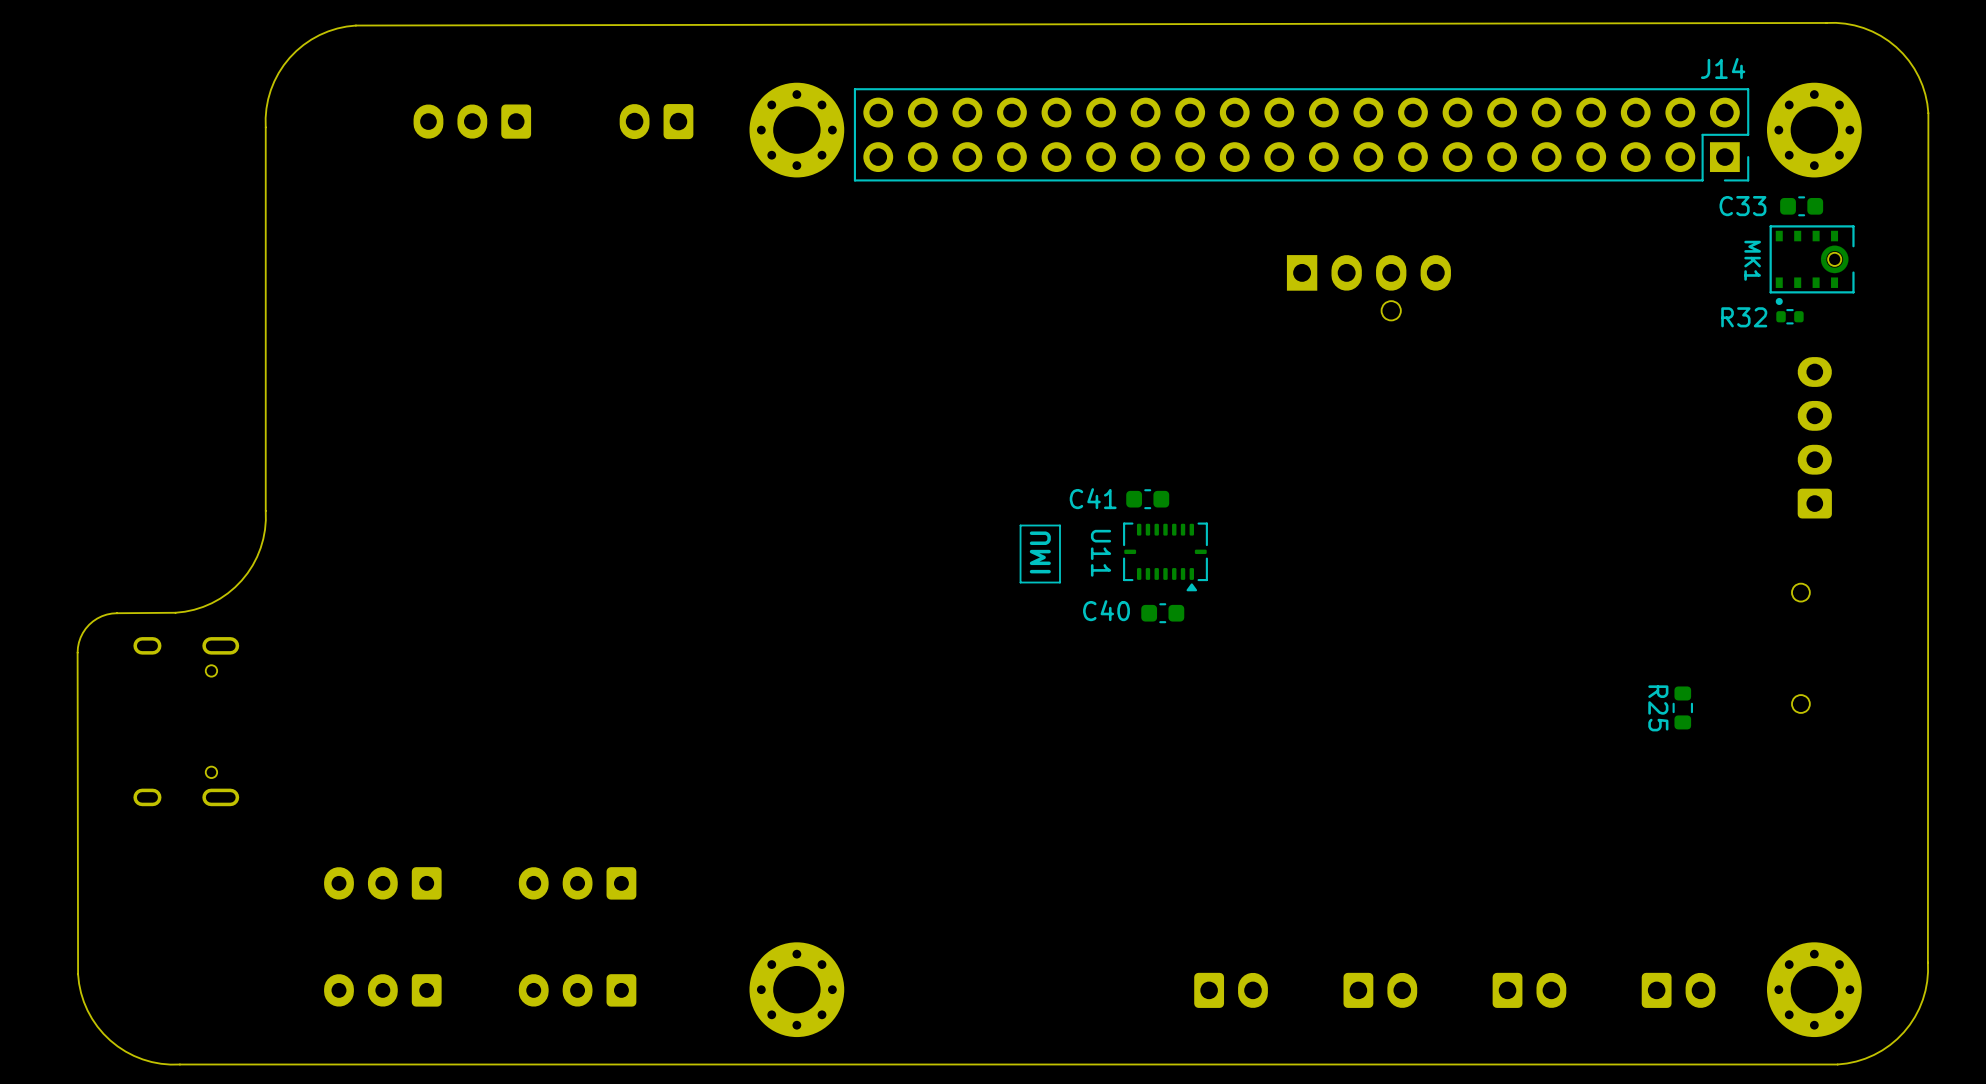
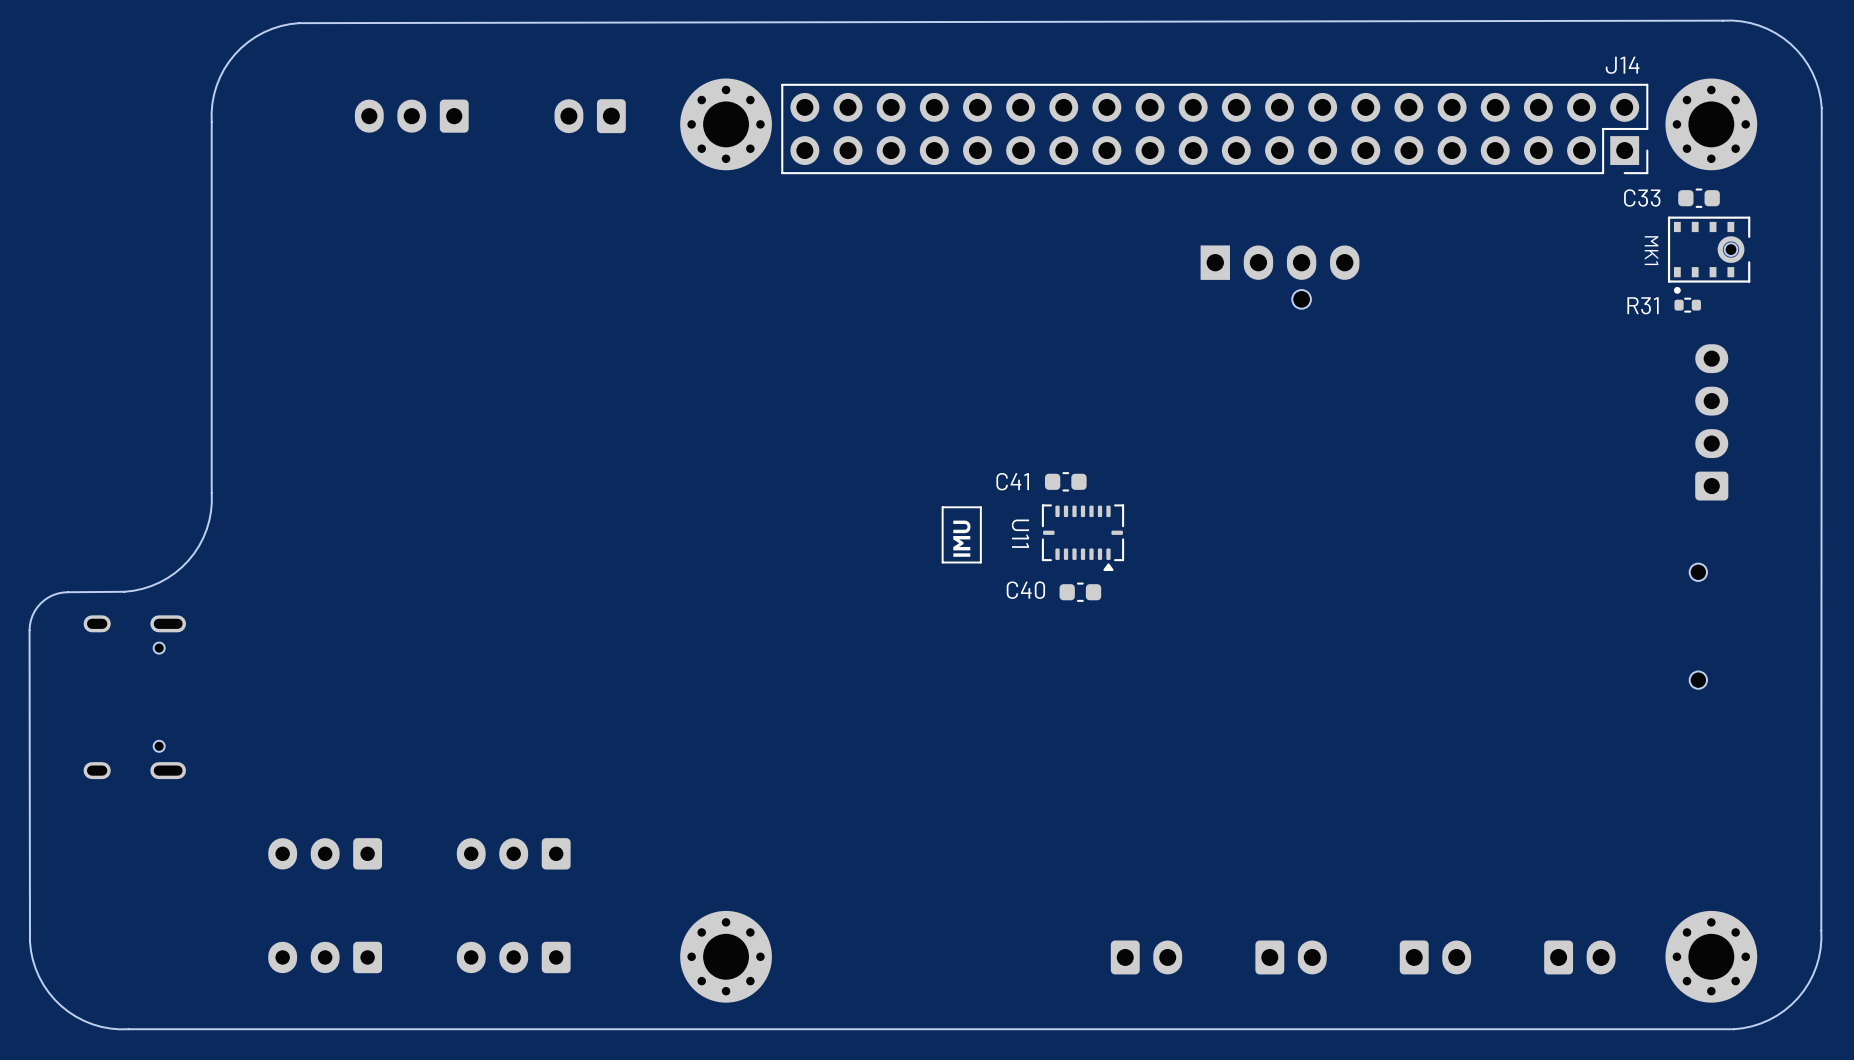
R32 name: R32 (1744, 317) -> R31 (1643, 305)
R25: (1682, 707) -> none

